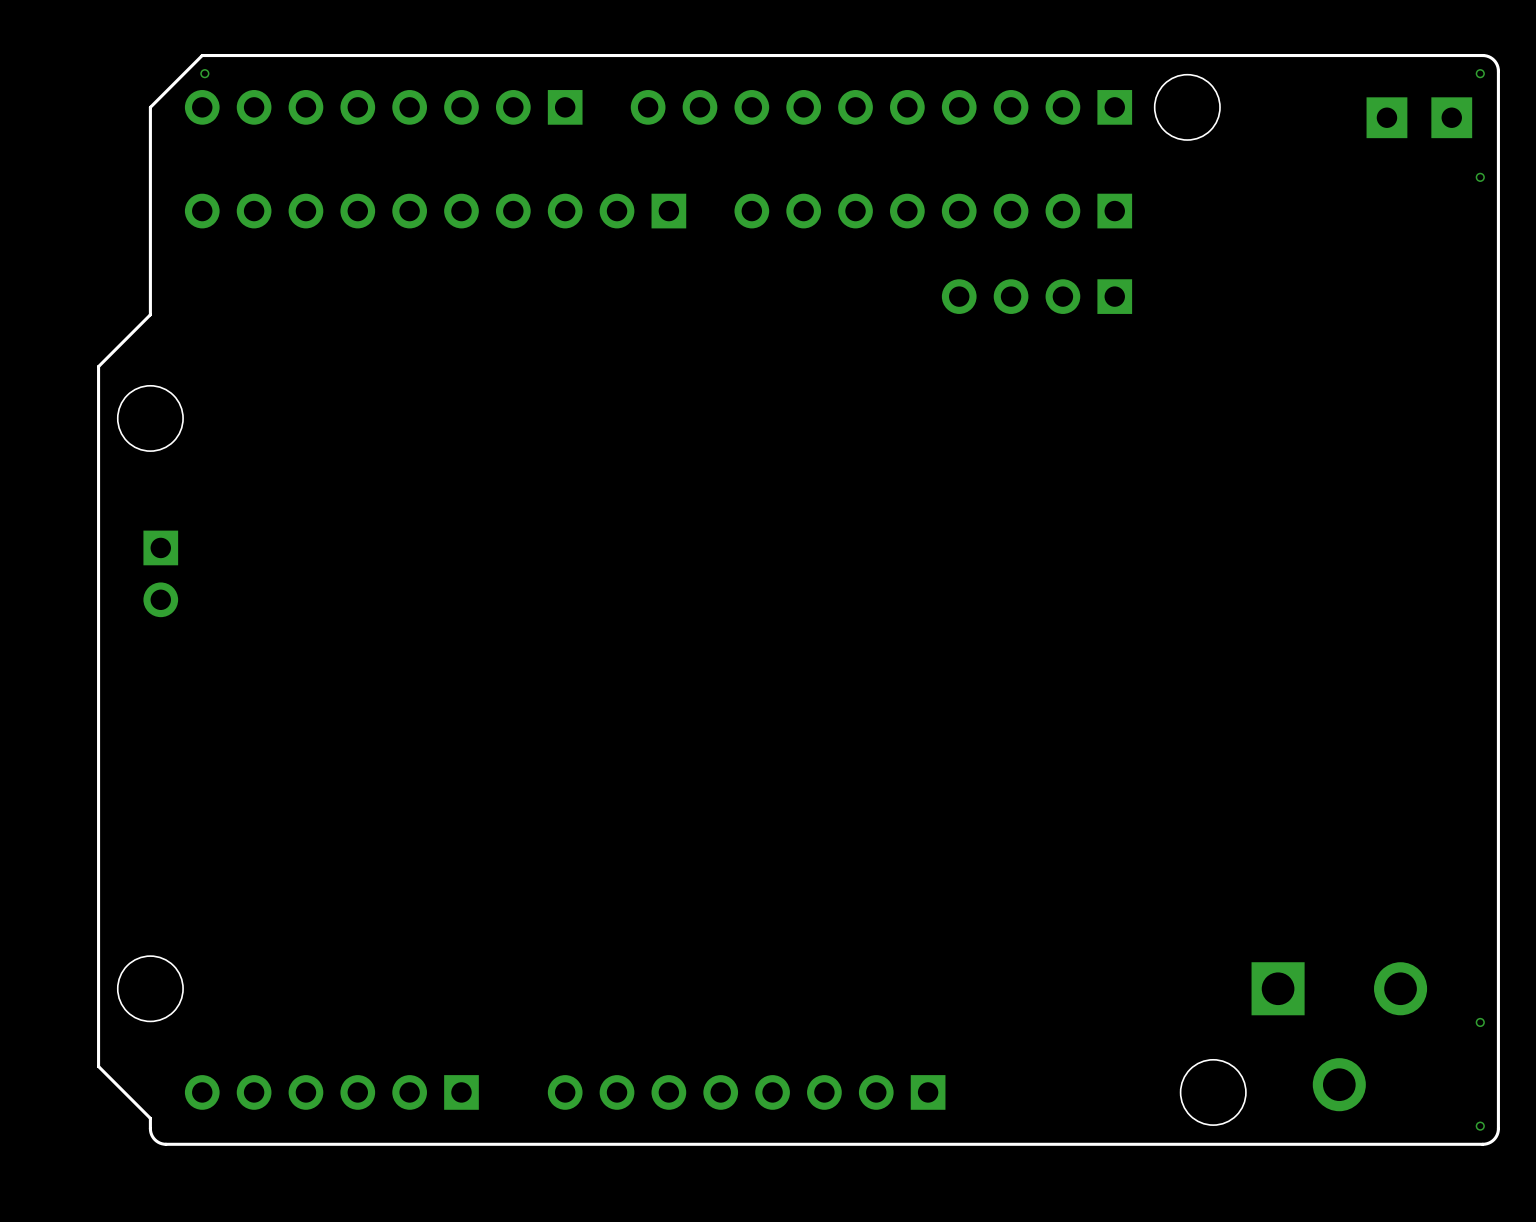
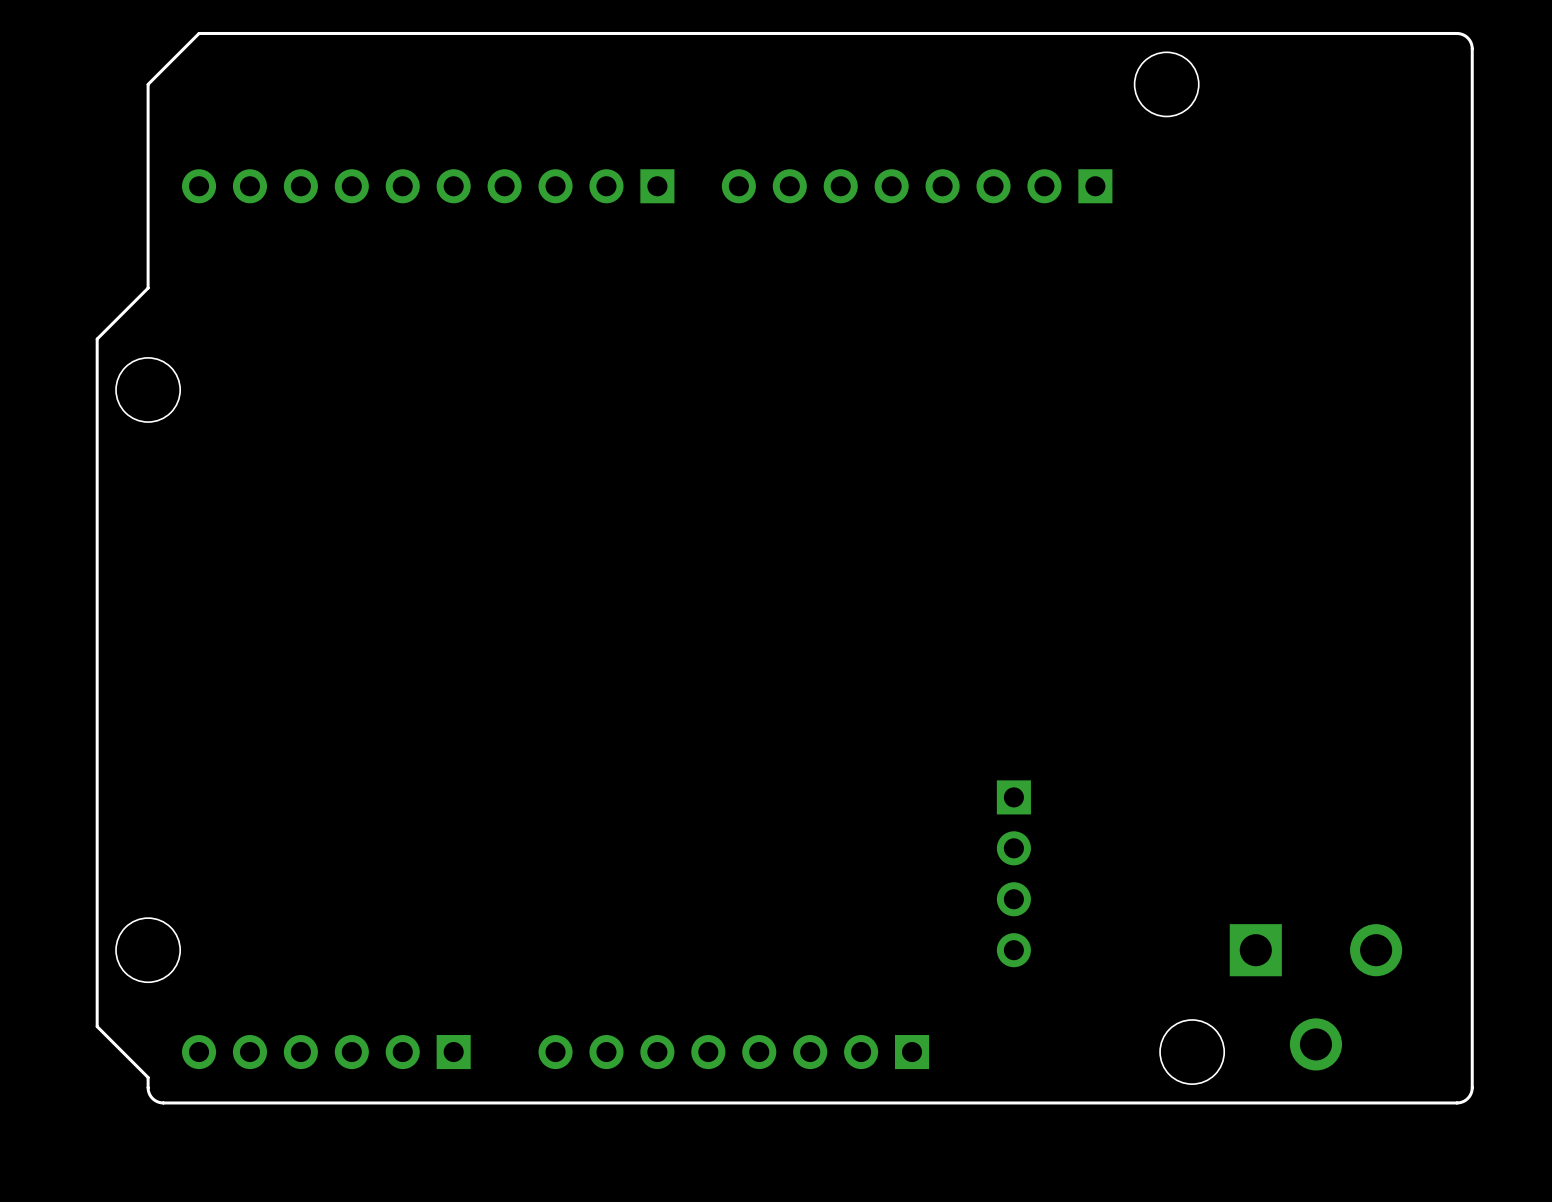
via: (204, 73) -> none
via: (1480, 73) -> none
part: (383, 107) -> none
part: (881, 107) -> none
part: (1386, 117) -> none
part: (1451, 117) -> none
via: (1480, 177) -> none
part: (1036, 296) -> none
part: (160, 573) -> none
part: none -> (1013, 873)
via: (1480, 1022) -> none
via: (1480, 1126) -> none

